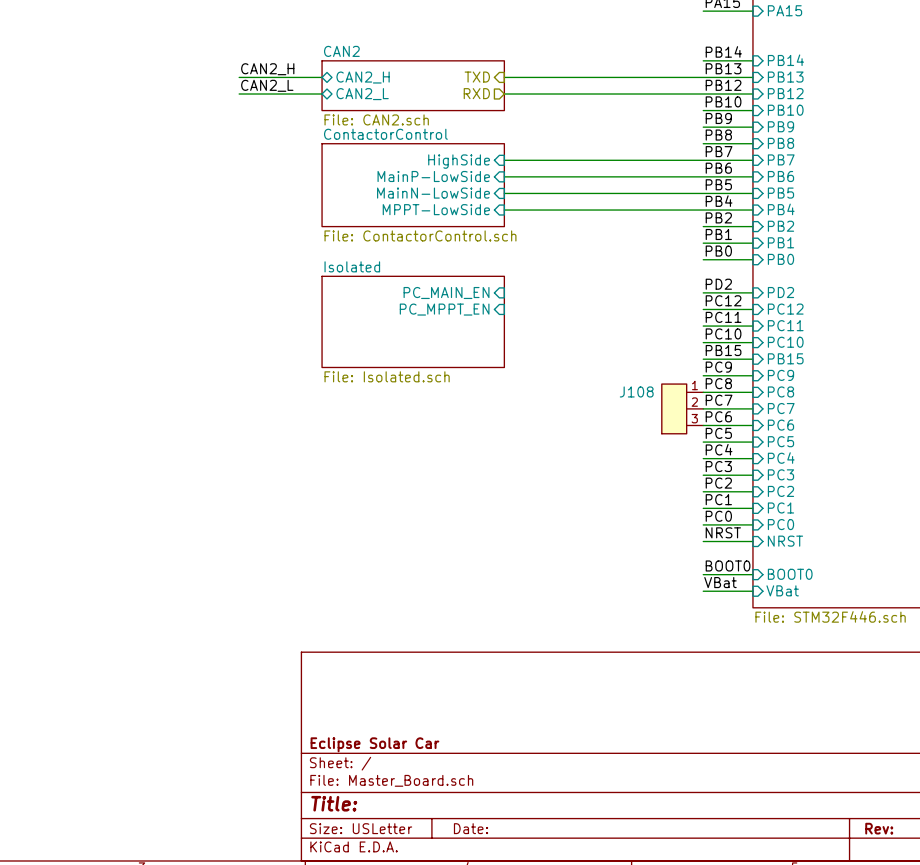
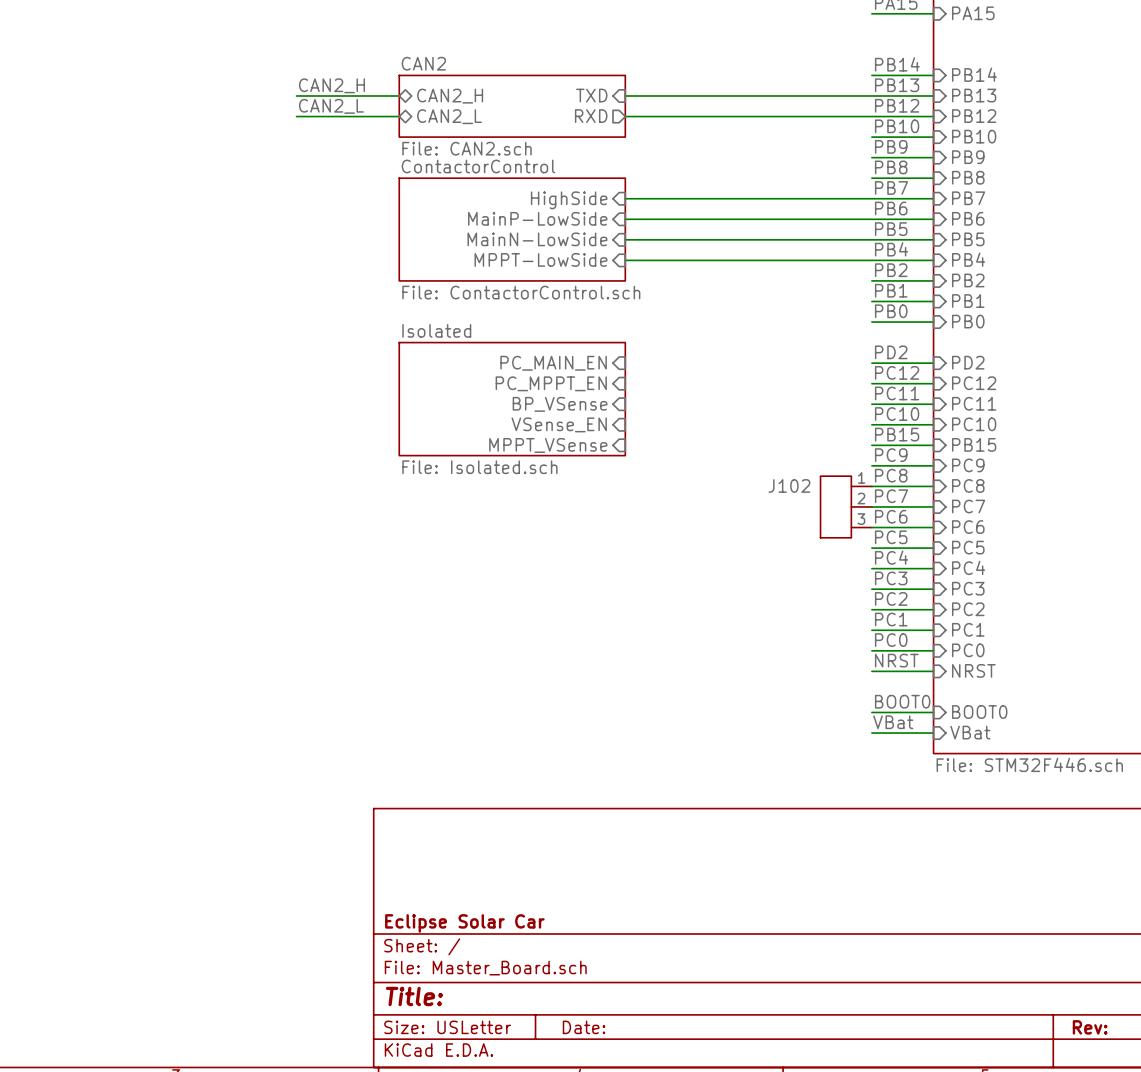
sheet pin: none -> BP_VSense (560, 404)
sheet pin: none -> VSense_EN (559, 424)
sheet pin: none -> MPPT_VSense (548, 445)
J108 name: J108 (636, 391) -> J102 (789, 485)

